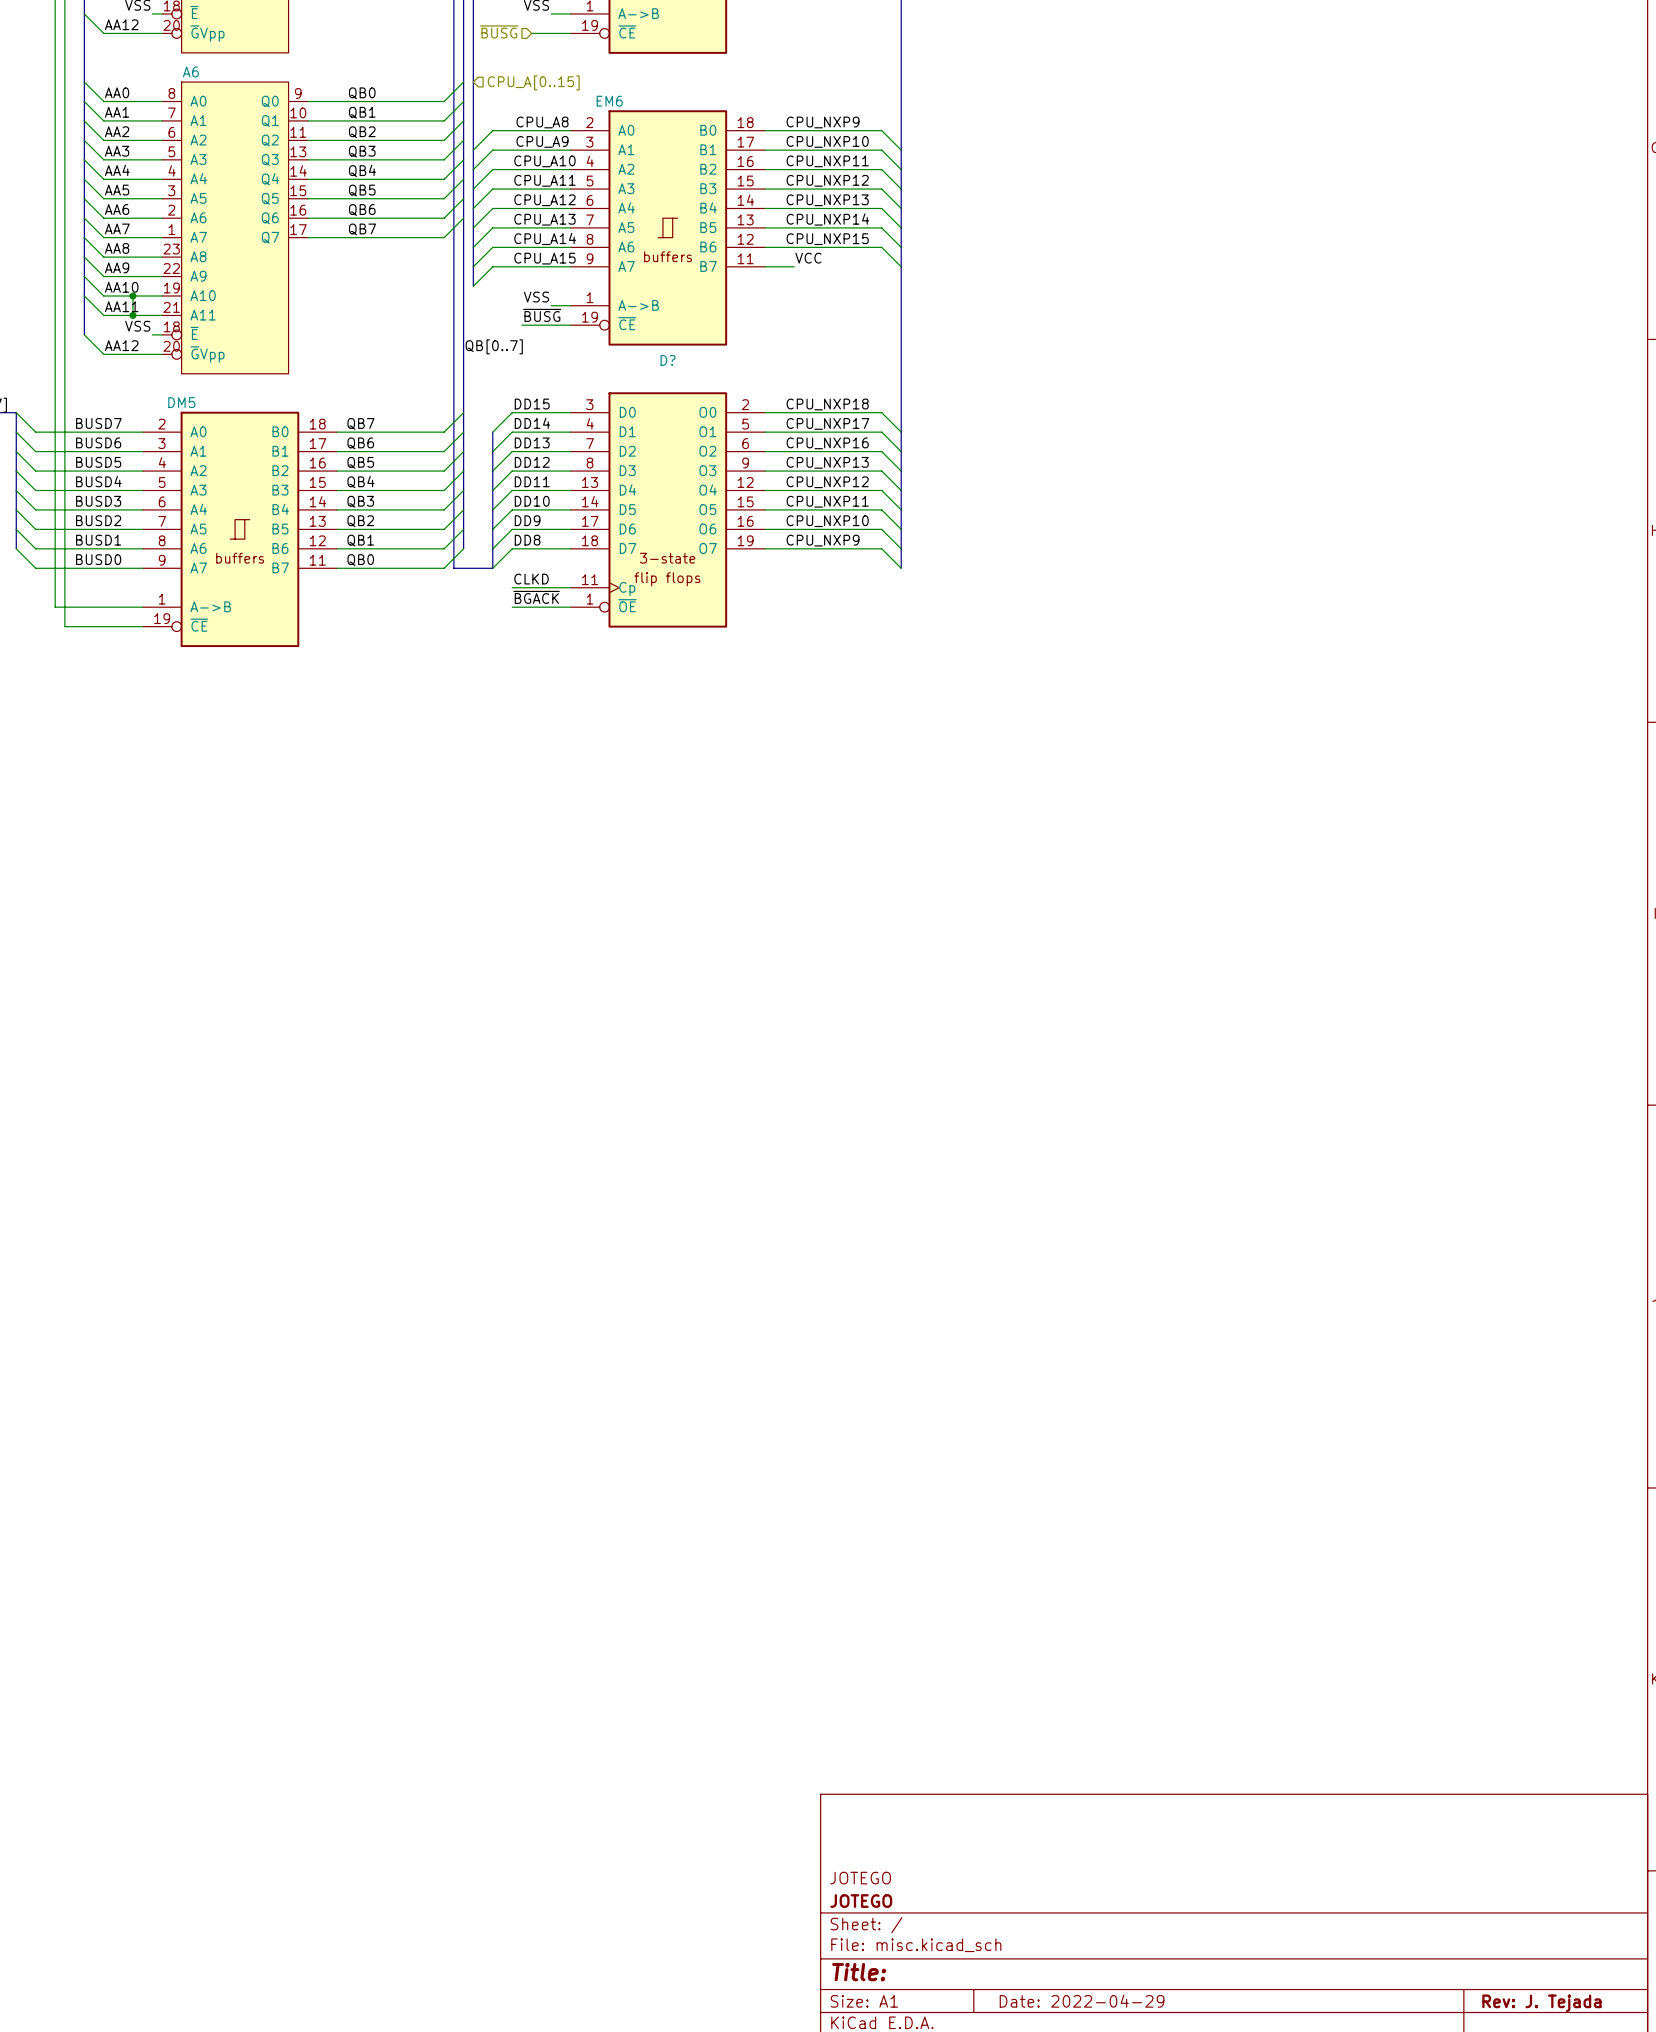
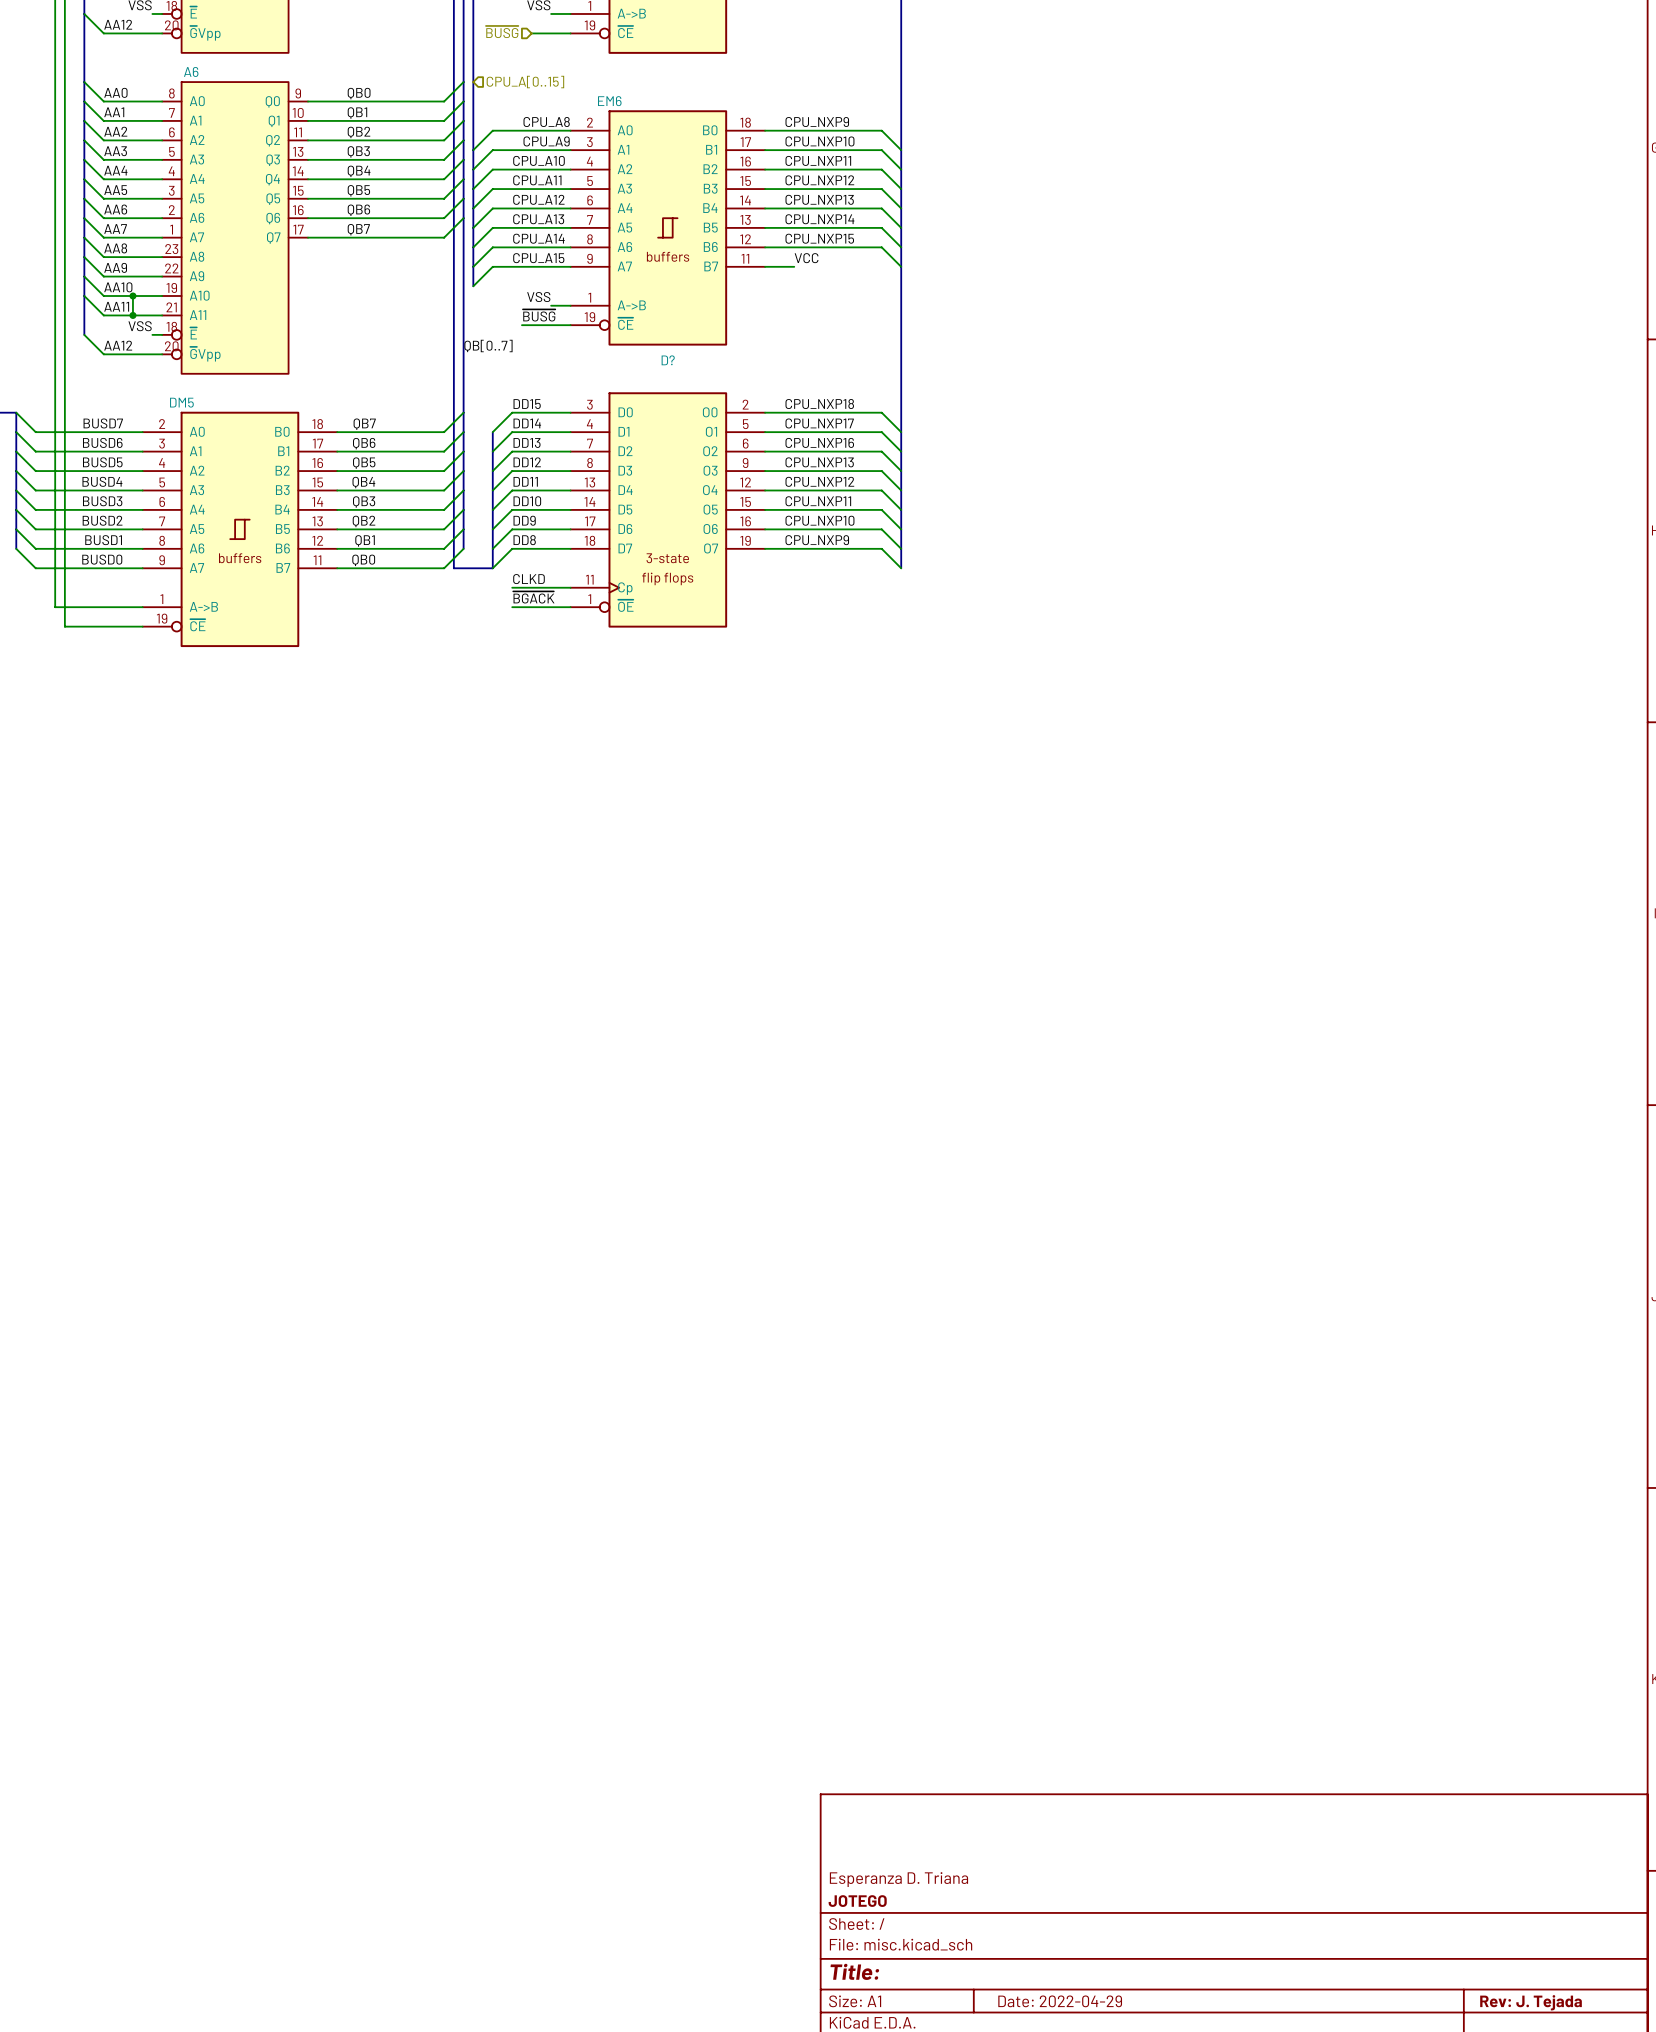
title block: JOTEGO (860, 1878) -> Esperanza D. Triana (898, 1879)

